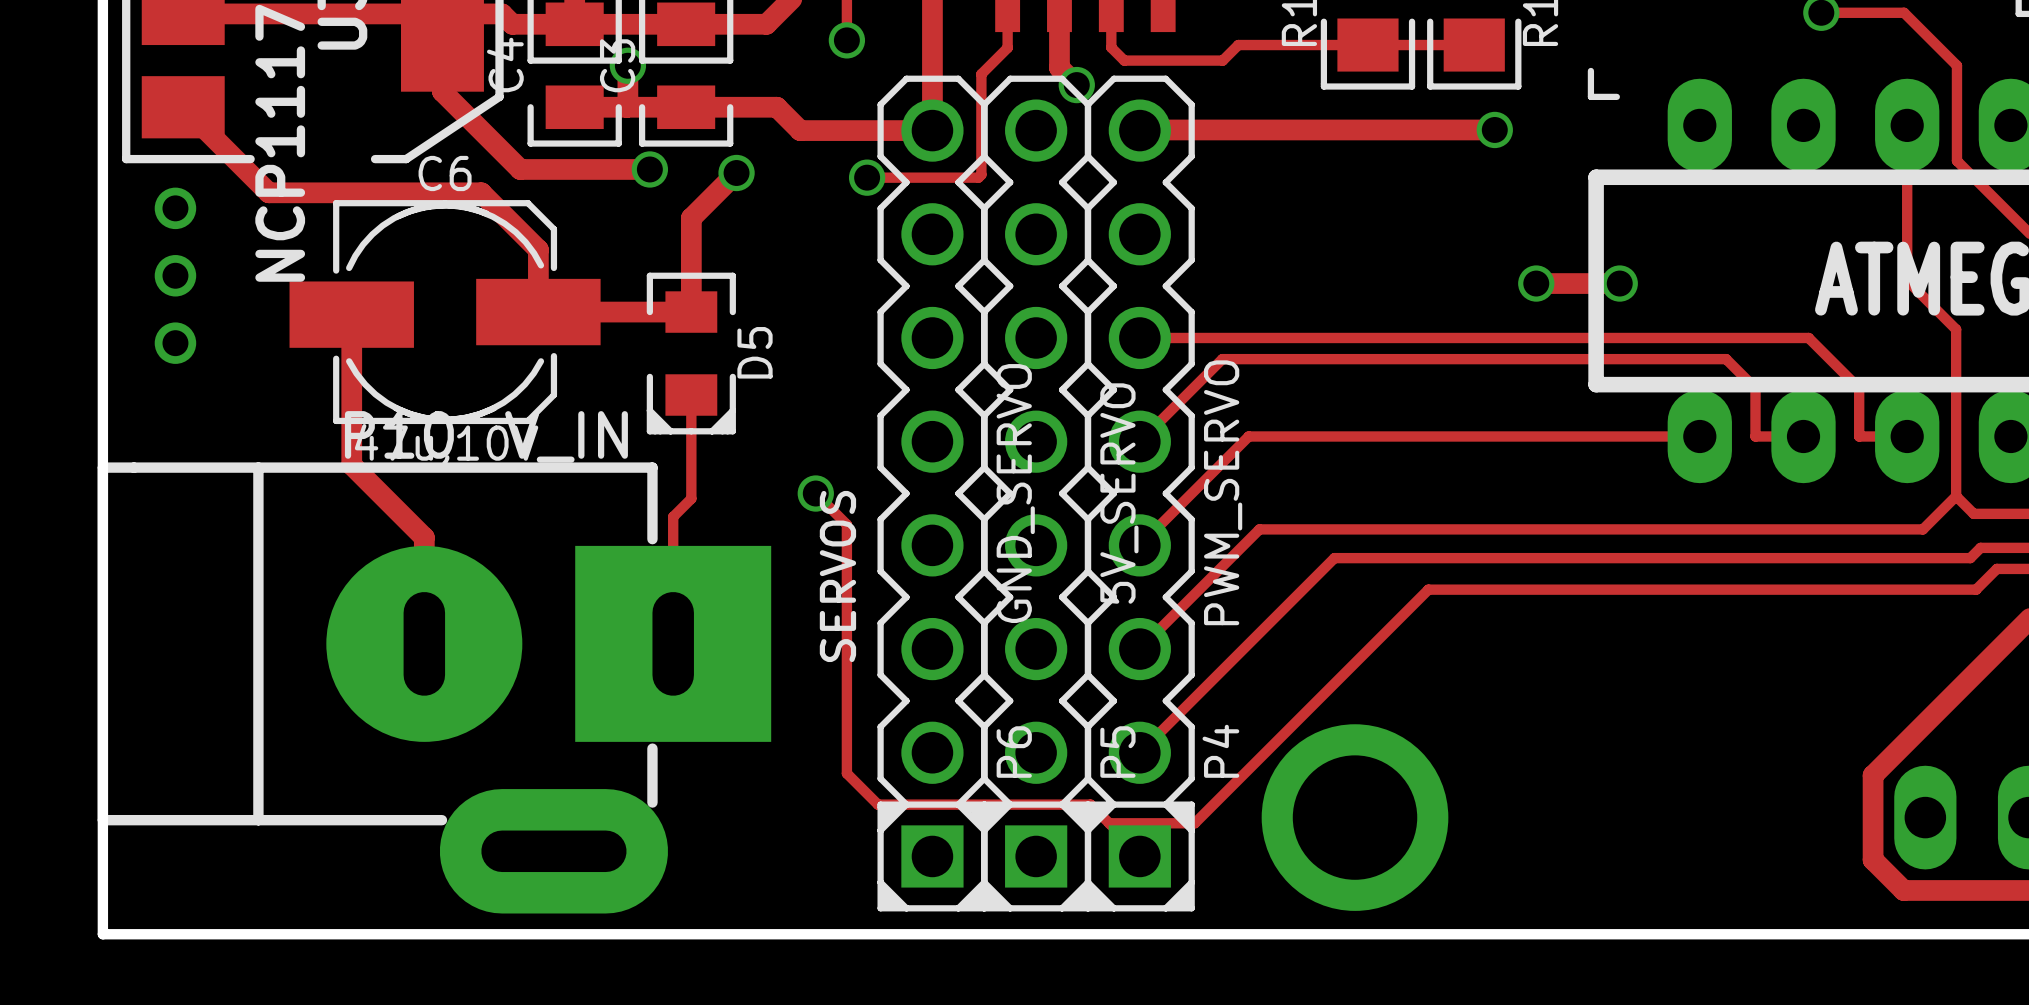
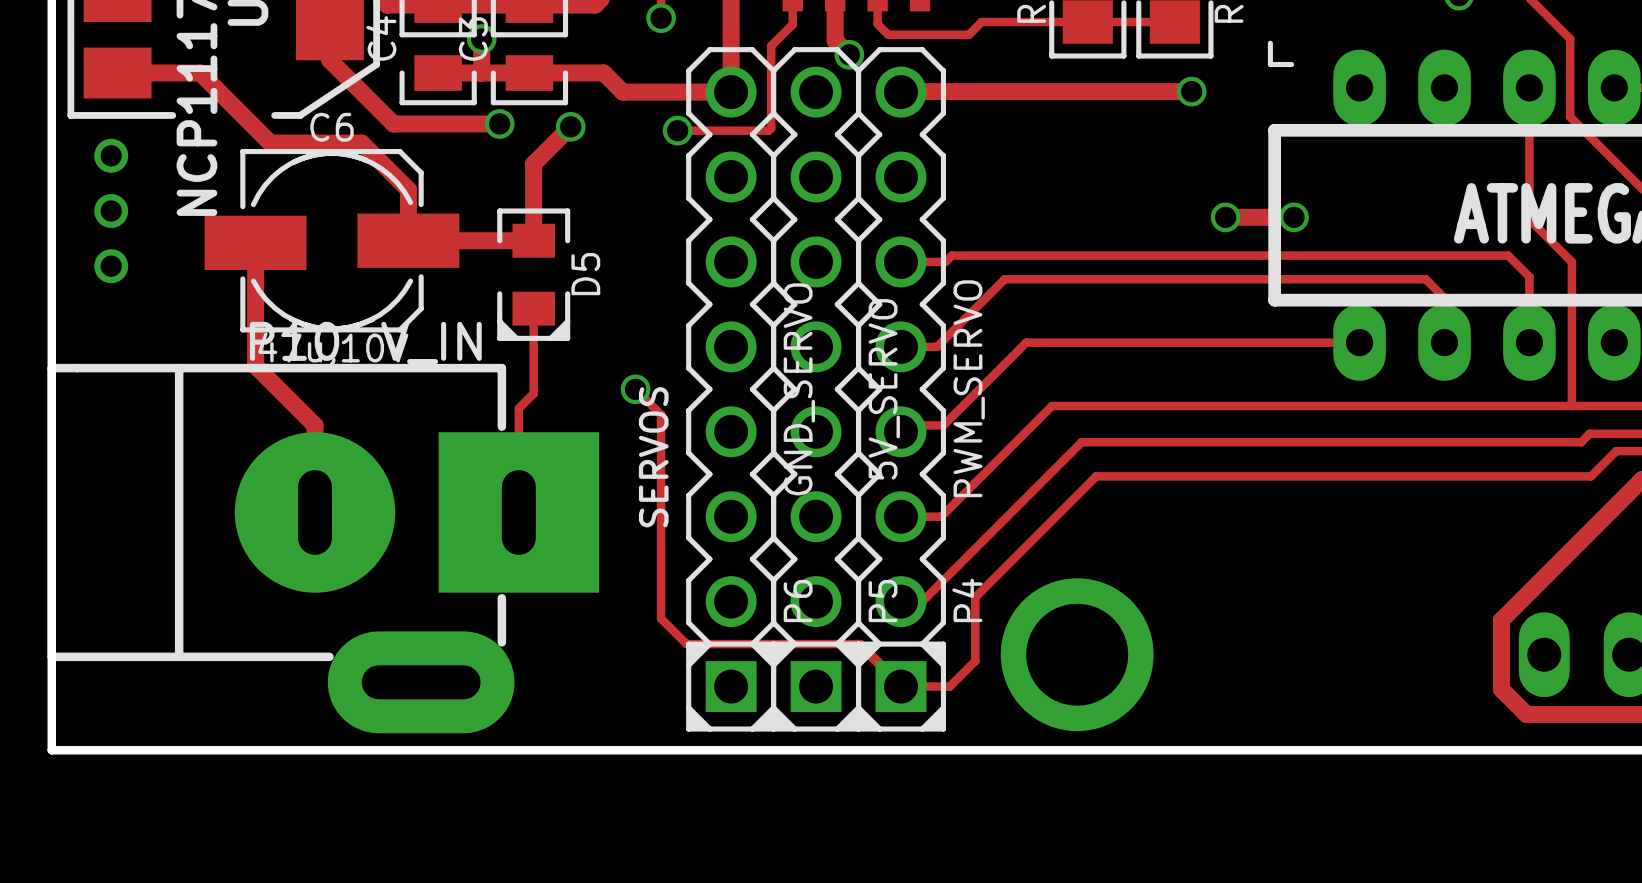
track: (183, 107) (268, 192) (369, 192) -> (117, 73) (200, 73) (270, 143)
track: (1907, 280) (1956, 329) (1956, 496) -> (1529, 214) (1529, 219) (1571, 261) (1571, 405)
track: (1194, 337) (1808, 337) (1859, 388) (1859, 436) (1907, 436) -> (945, 261) (951, 255) (1508, 255) (1529, 276) (1529, 342)
track: (1266, 359) (1222, 359) (1139, 441) -> (1004, 279) (937, 346) (900, 346)
track: (1726, 359) (1755, 388) (1755, 436) (1803, 436) -> (1381, 279) (1425, 279) (1444, 298) (1444, 342)
track: (1292, 436) (1248, 436) (1147, 537) -> (1026, 342) (943, 425) (907, 425)
track: (1956, 496) (1922, 529) (1259, 529) (1139, 649) -> (1583, 405) (1052, 405) (941, 516) (900, 516)
track: (1956, 496) (1973, 513) -> none
track: (1360, 558) (1334, 558) (1139, 752) -> (1081, 442) (922, 601) (900, 601)
track: (2013, 568) (1996, 568) (1976, 589) (1428, 589) (1194, 823) (1109, 823) -> (1616, 451) (1590, 476) (1096, 476) (975, 597) (975, 661) (949, 686) (900, 686) (858, 644)

